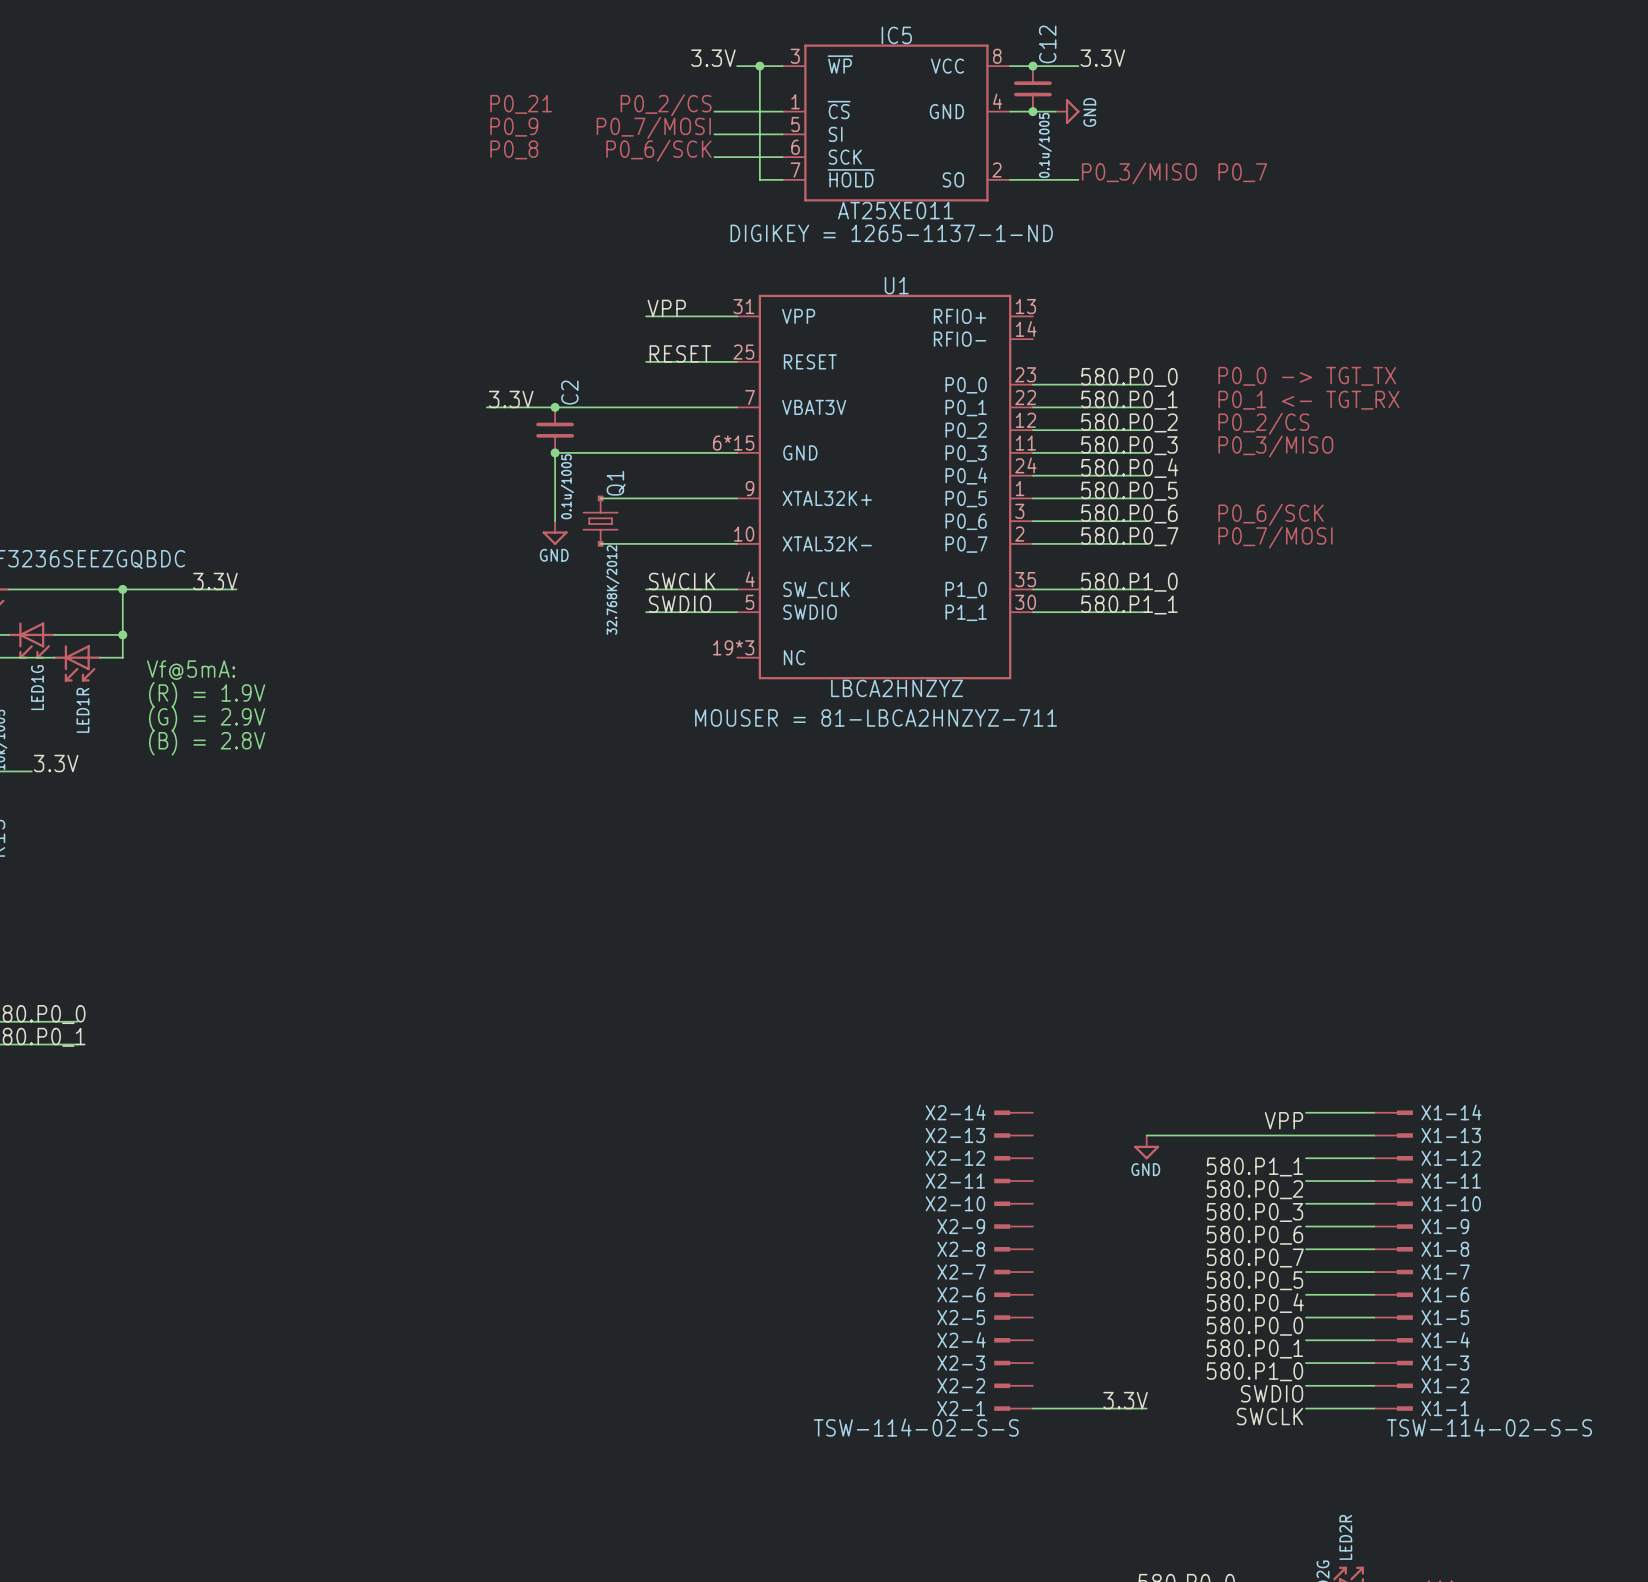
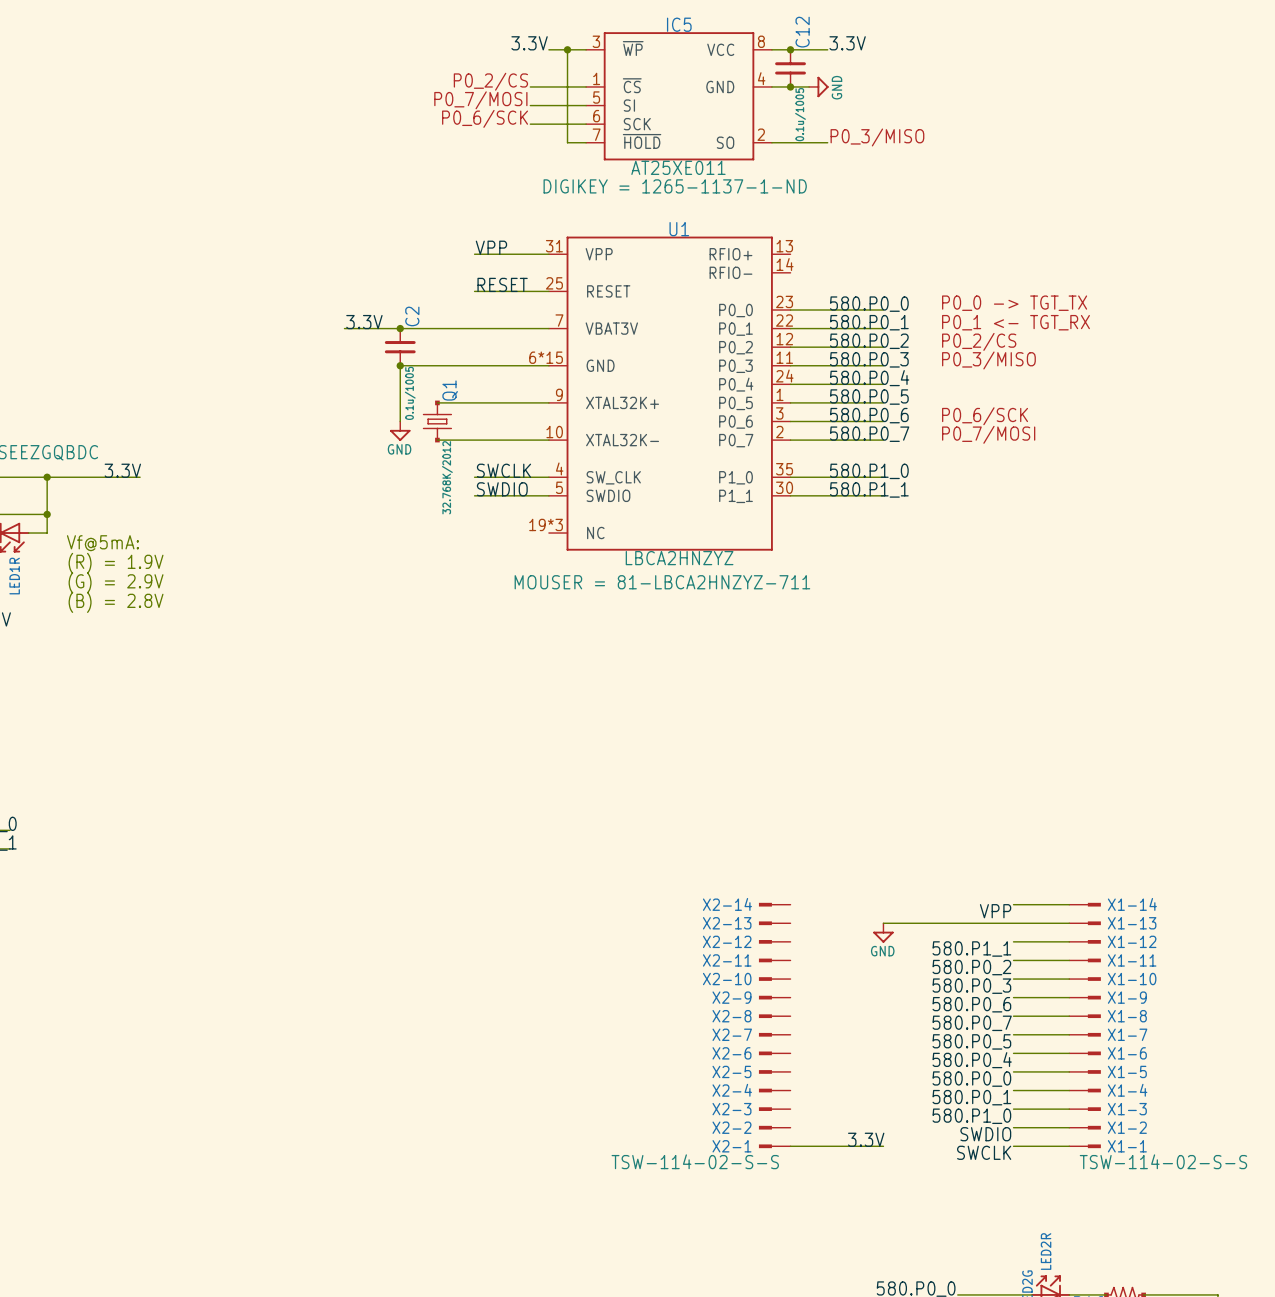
text: P0_21 (521, 104) -> none
text: P0_9 (514, 127) -> none
text: P0_8 (514, 149) -> none
text: P0_7 (1242, 172) -> none

